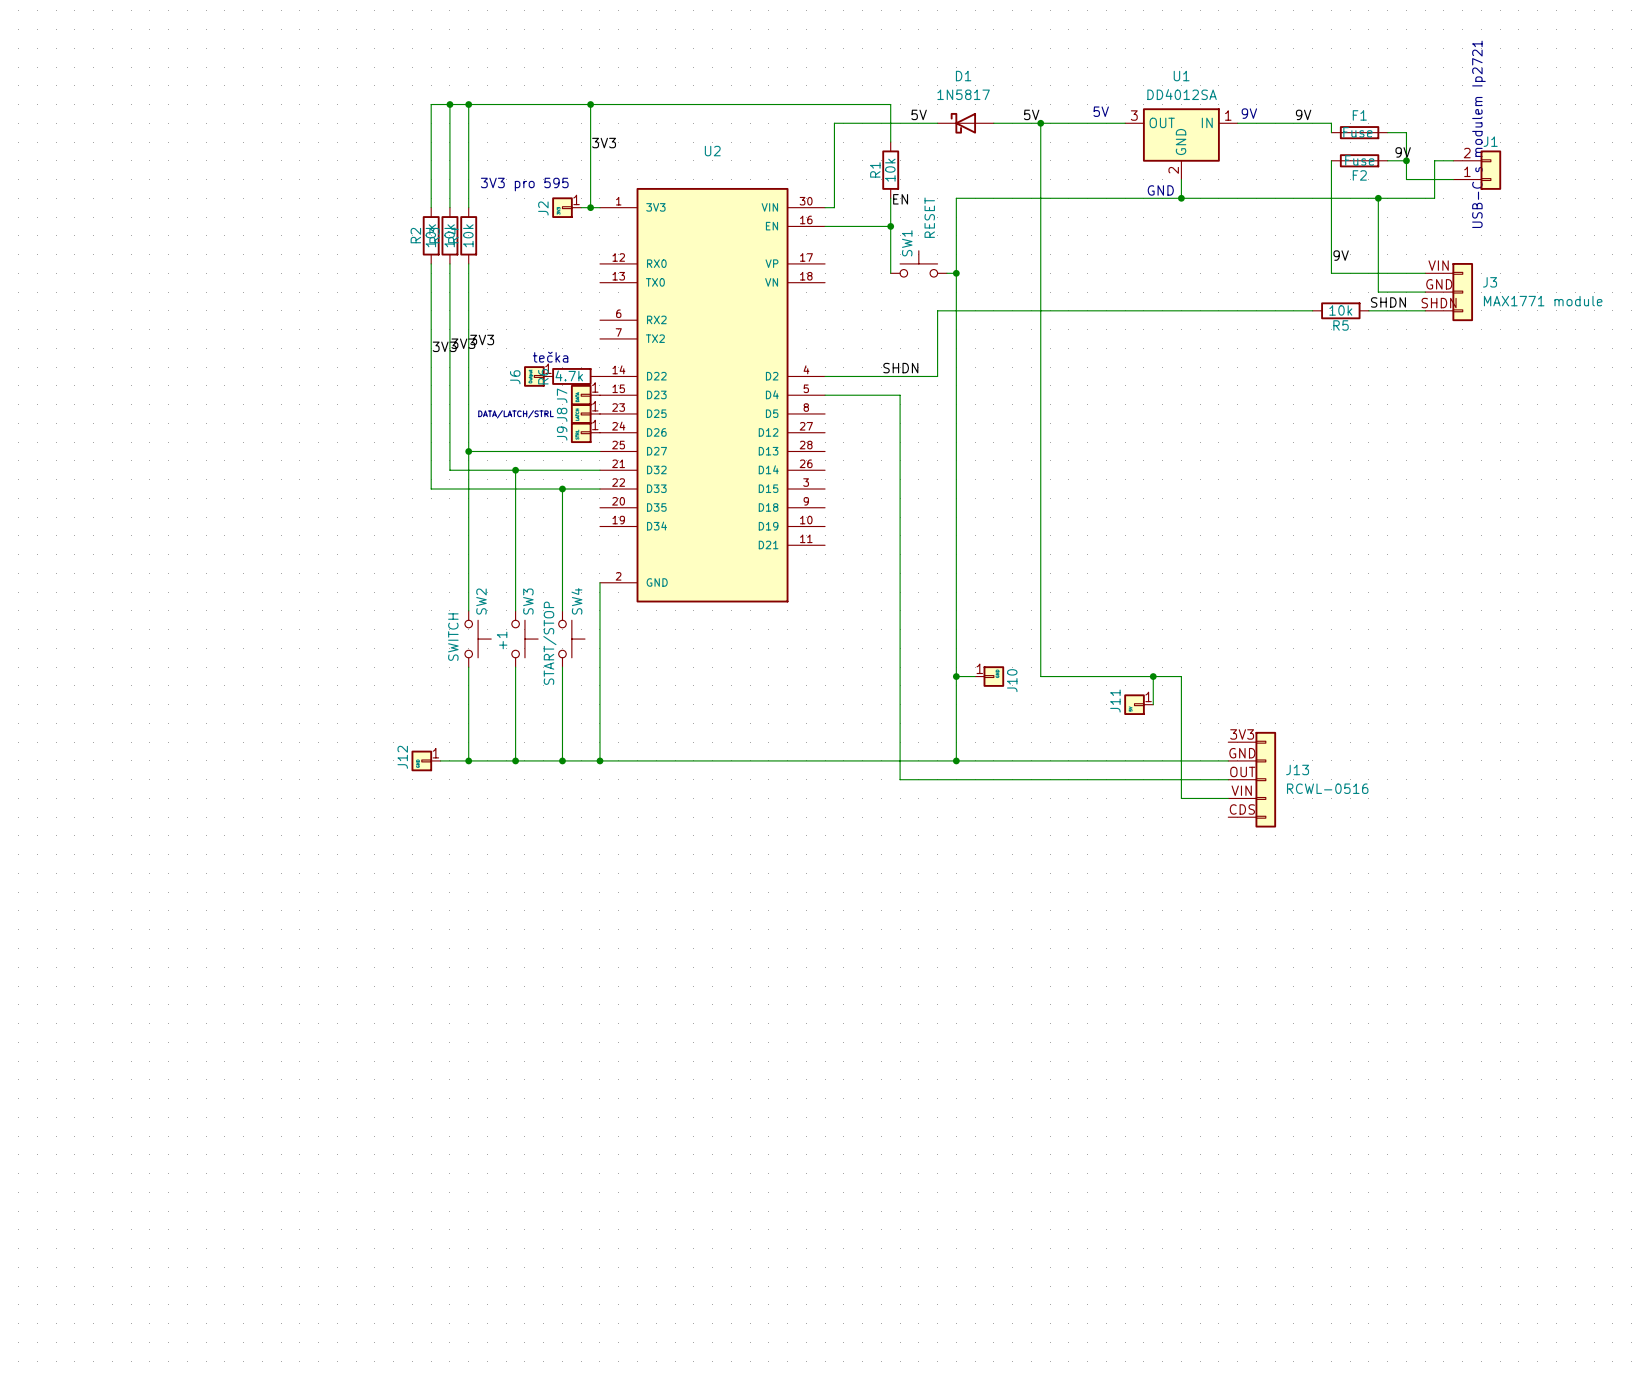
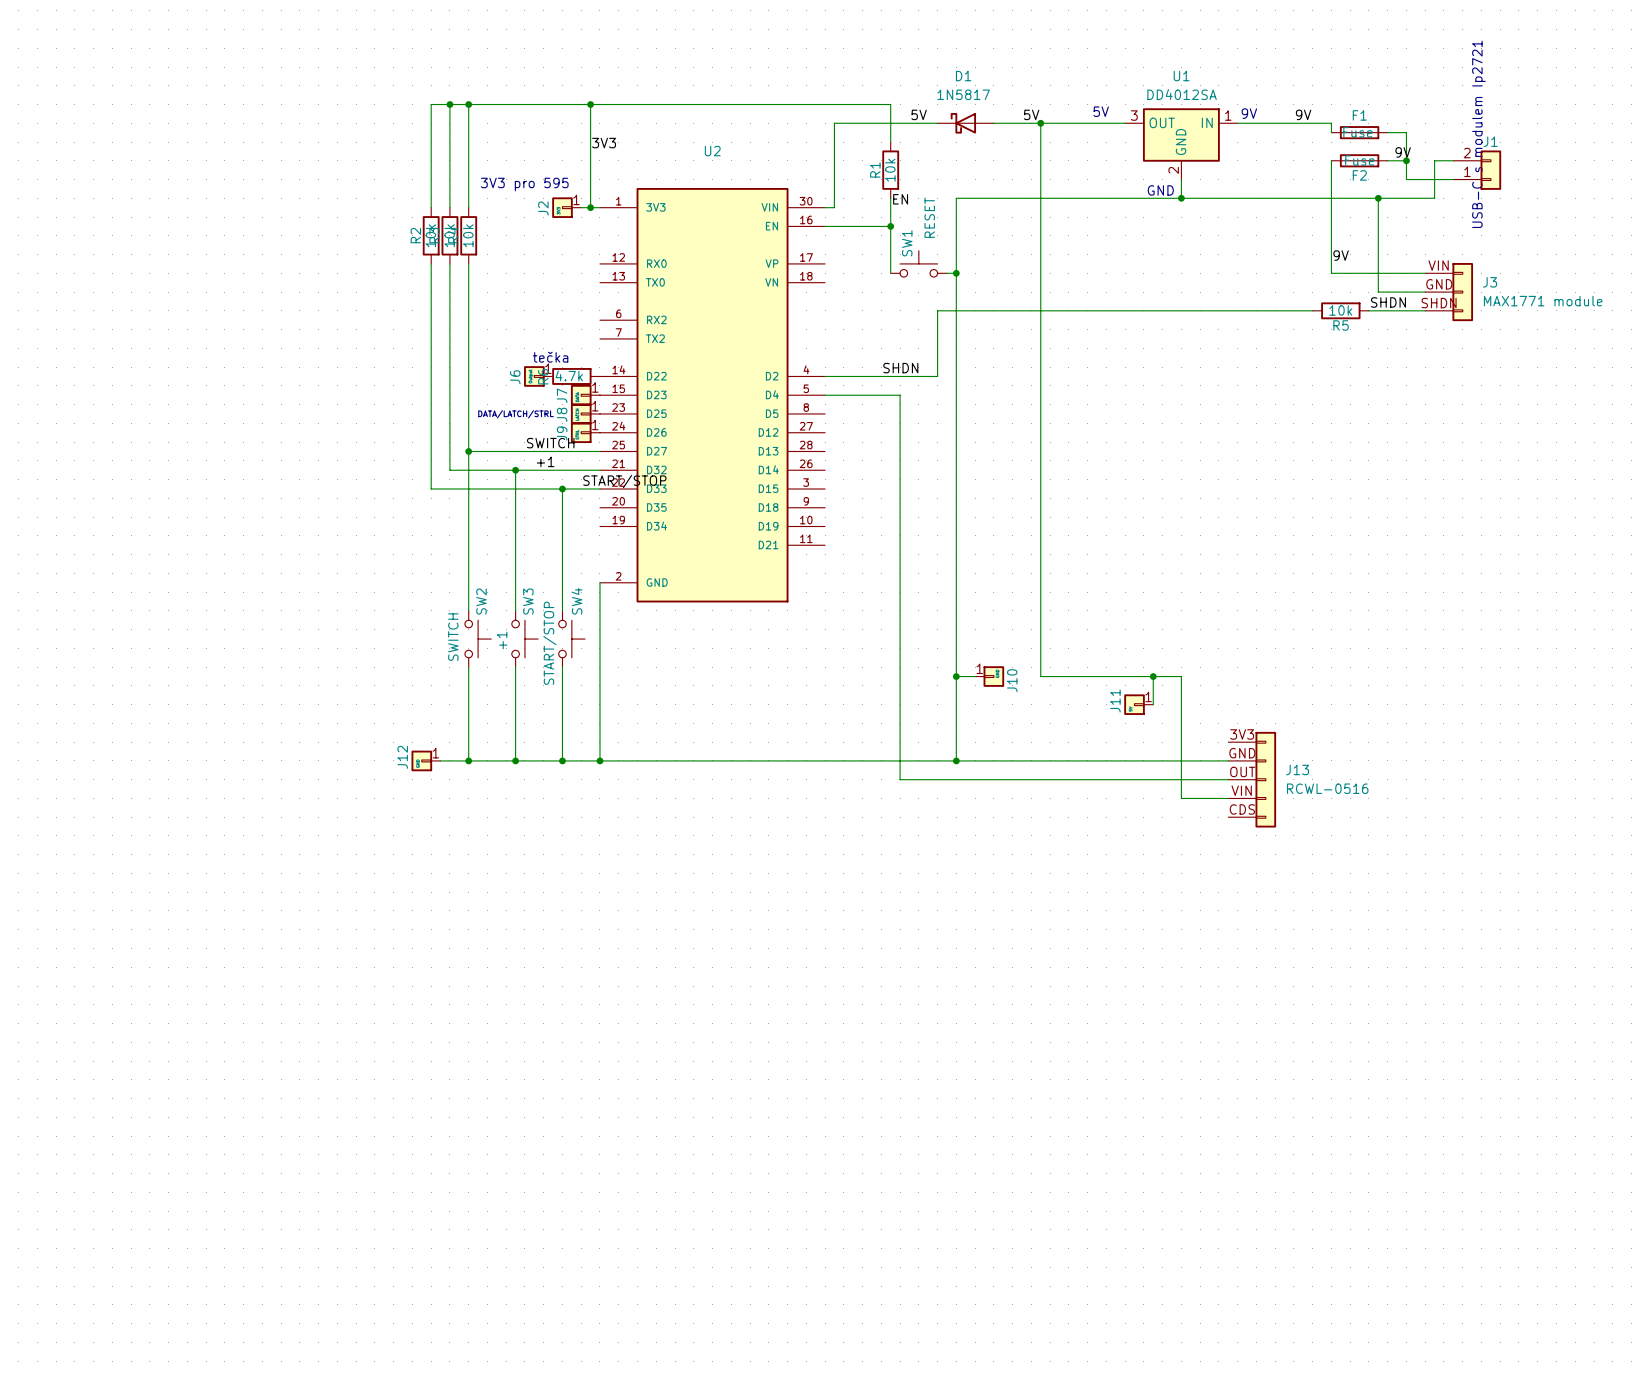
label: 3V3 (482, 339) -> none
label: 3V3 (463, 343) -> none
label: 3V3 (444, 346) -> none
label: none -> SWITCH (550, 443)
label: none -> +1 (545, 461)
label: none -> START/STOP (624, 481)

